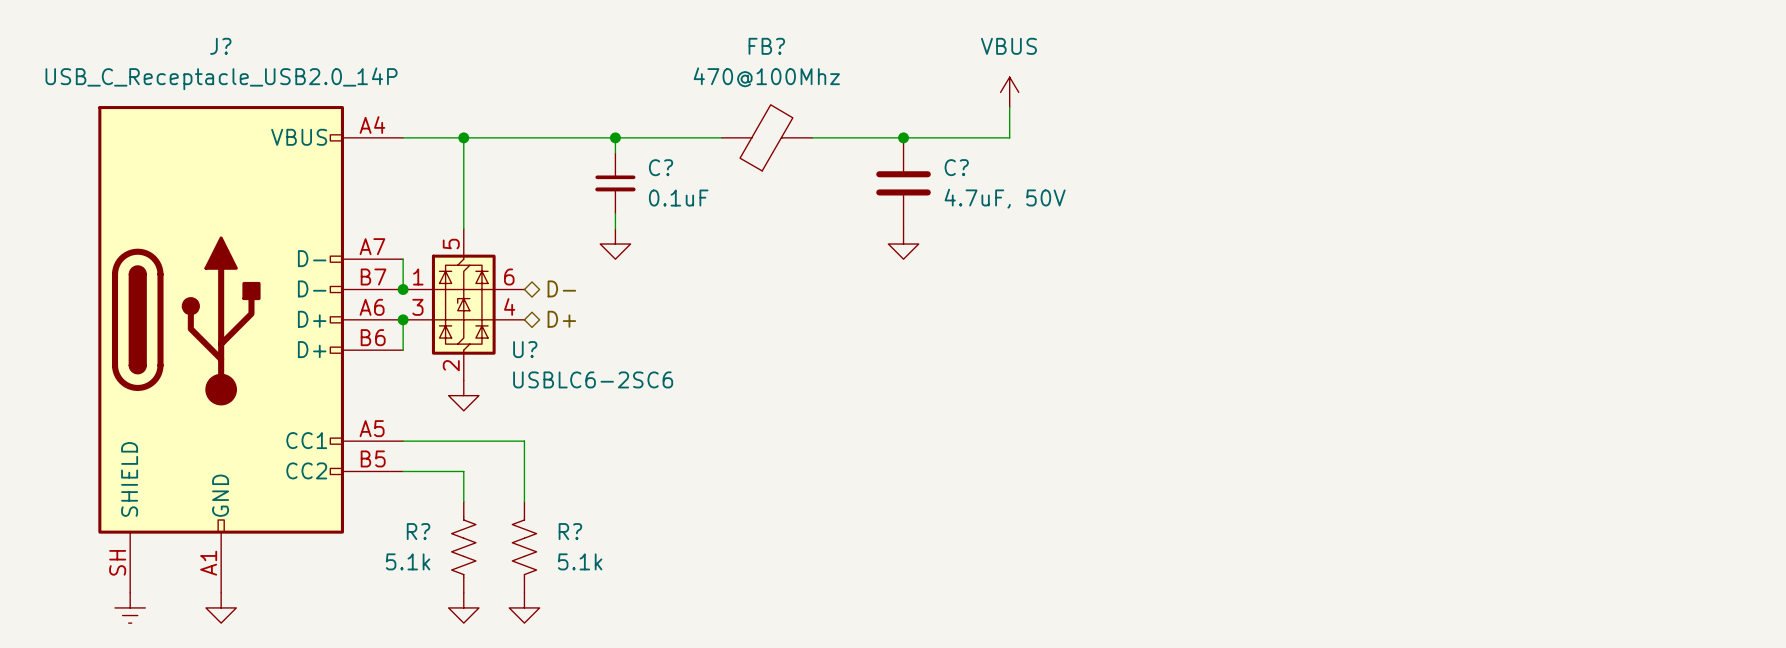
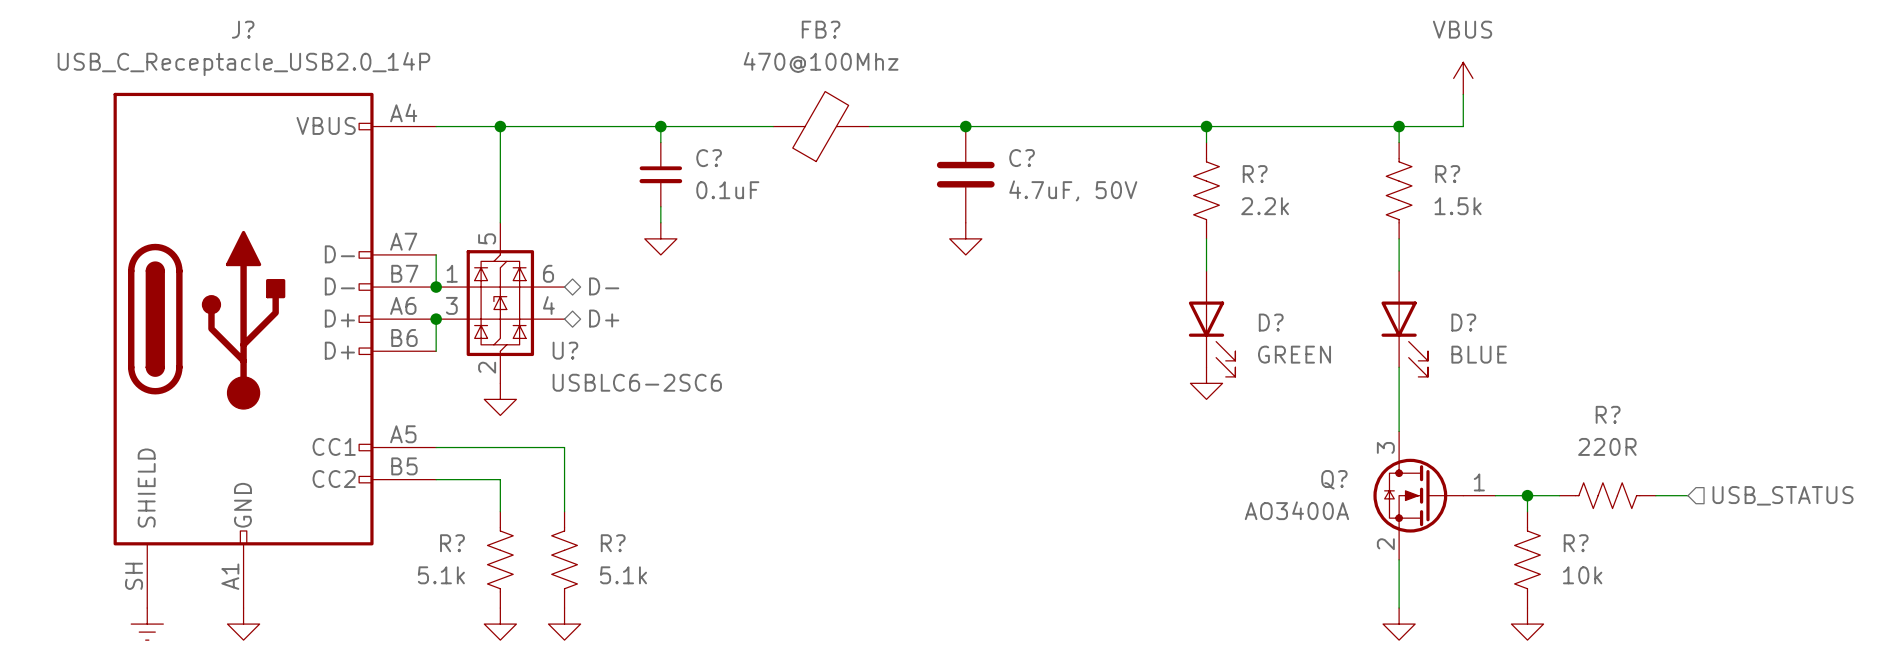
power symbol: VBUS (1009, 92) -> none
power symbol: none -> VBUS (1463, 78)
wire: (1009, 107) (1009, 137) -> (1463, 94) (1463, 126) (1078, 126)
wire: none -> (1206, 126) (1206, 142)
junction: none -> (1206, 126)
wire: none -> (1399, 126) (1399, 142)
junction: none -> (1399, 126)
R?: none -> 2.2k (1206, 190)
R?: none -> 1.5k (1399, 190)
wire: none -> (1206, 238) (1206, 270)
wire: none -> (1399, 238) (1399, 270)
D?: none -> GREEN (1212, 323)
D?: none -> BLUE (1404, 323)
wire: none -> (1399, 367) (1399, 431)
power symbol: none -> (1206, 383)
Q?: none -> AO3400A (1434, 495)
wire: none -> (1495, 495) (1559, 495)
wire: none -> (1527, 495) (1527, 511)
junction: none -> (1527, 495)
R?: none -> 220R (1607, 495)
wire: none -> (1655, 495) (1687, 495)
hierarchical label: none -> USB_STATUS (1783, 495)
wire: none -> (1399, 559) (1399, 608)
R?: none -> 10k (1527, 559)
power symbol: none -> (1399, 624)
power symbol: none -> (1527, 624)

